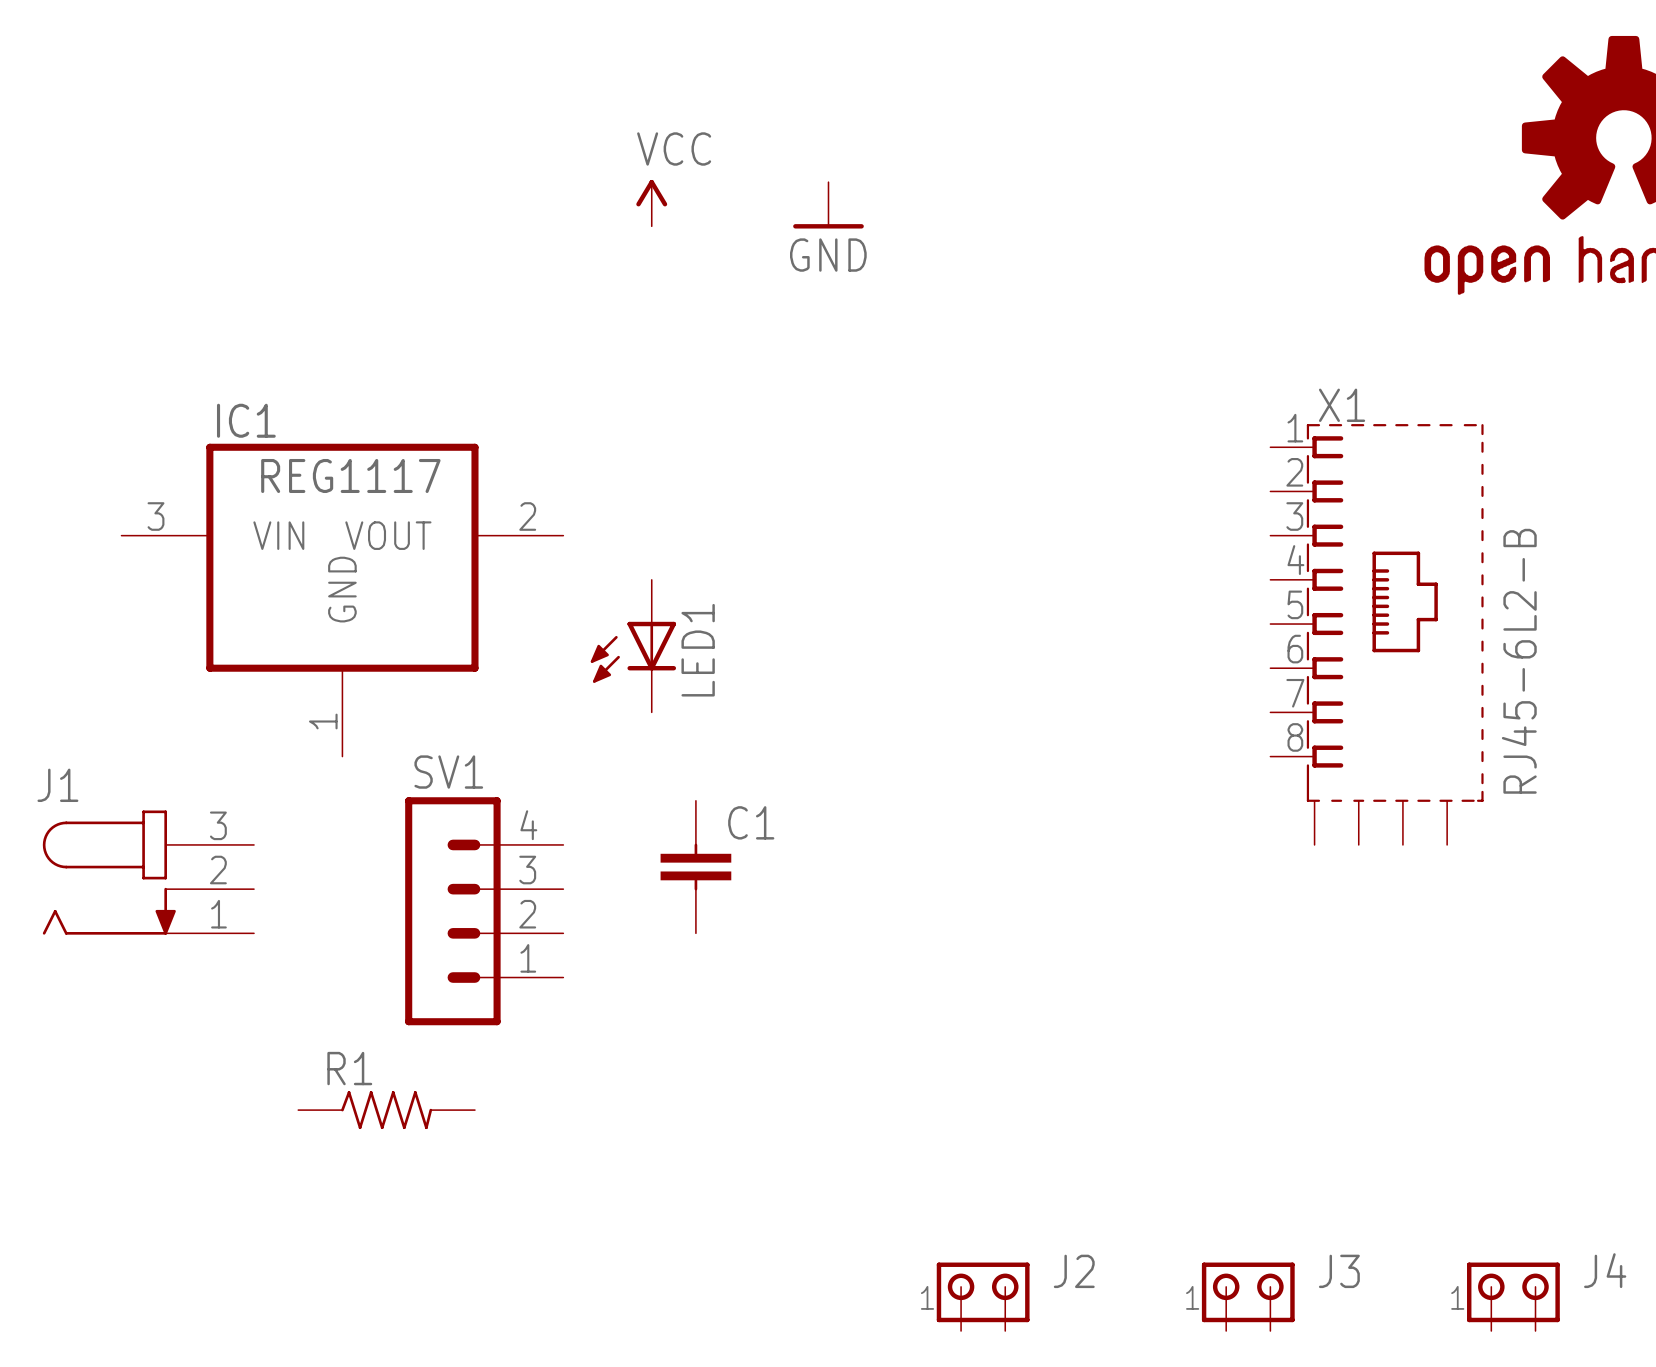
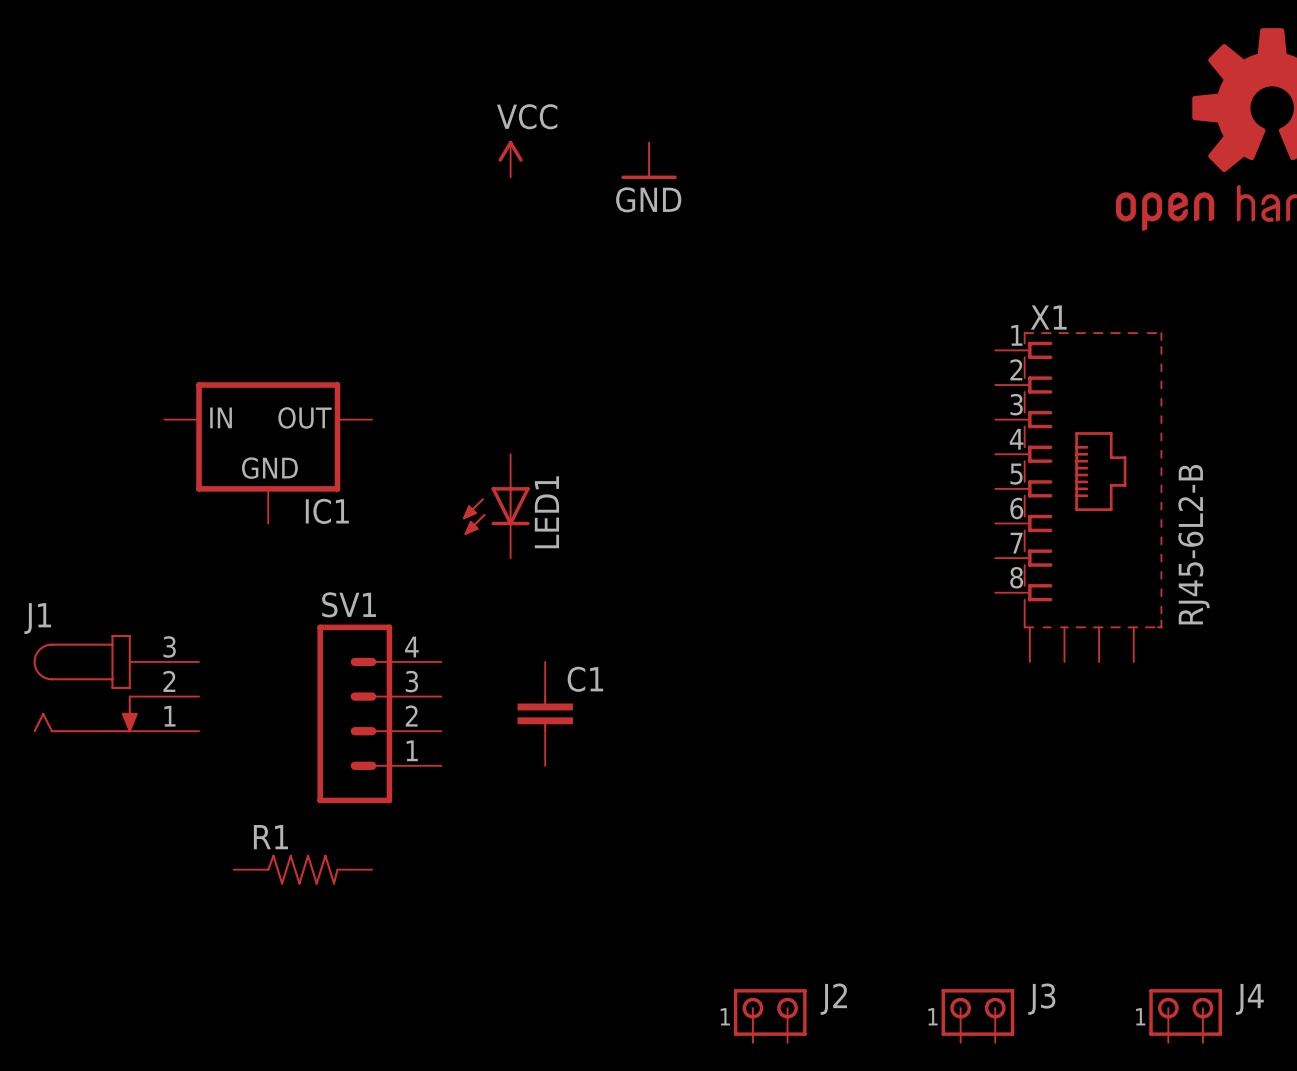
IC1 name position: IC1 (246, 420) -> IC1 (327, 511)
IC1 symbol: [121, 443, 564, 757] -> [164, 382, 373, 524]
IC1 value: REG1117 (350, 475) -> none
C1 position: (695, 867) -> (545, 713)

